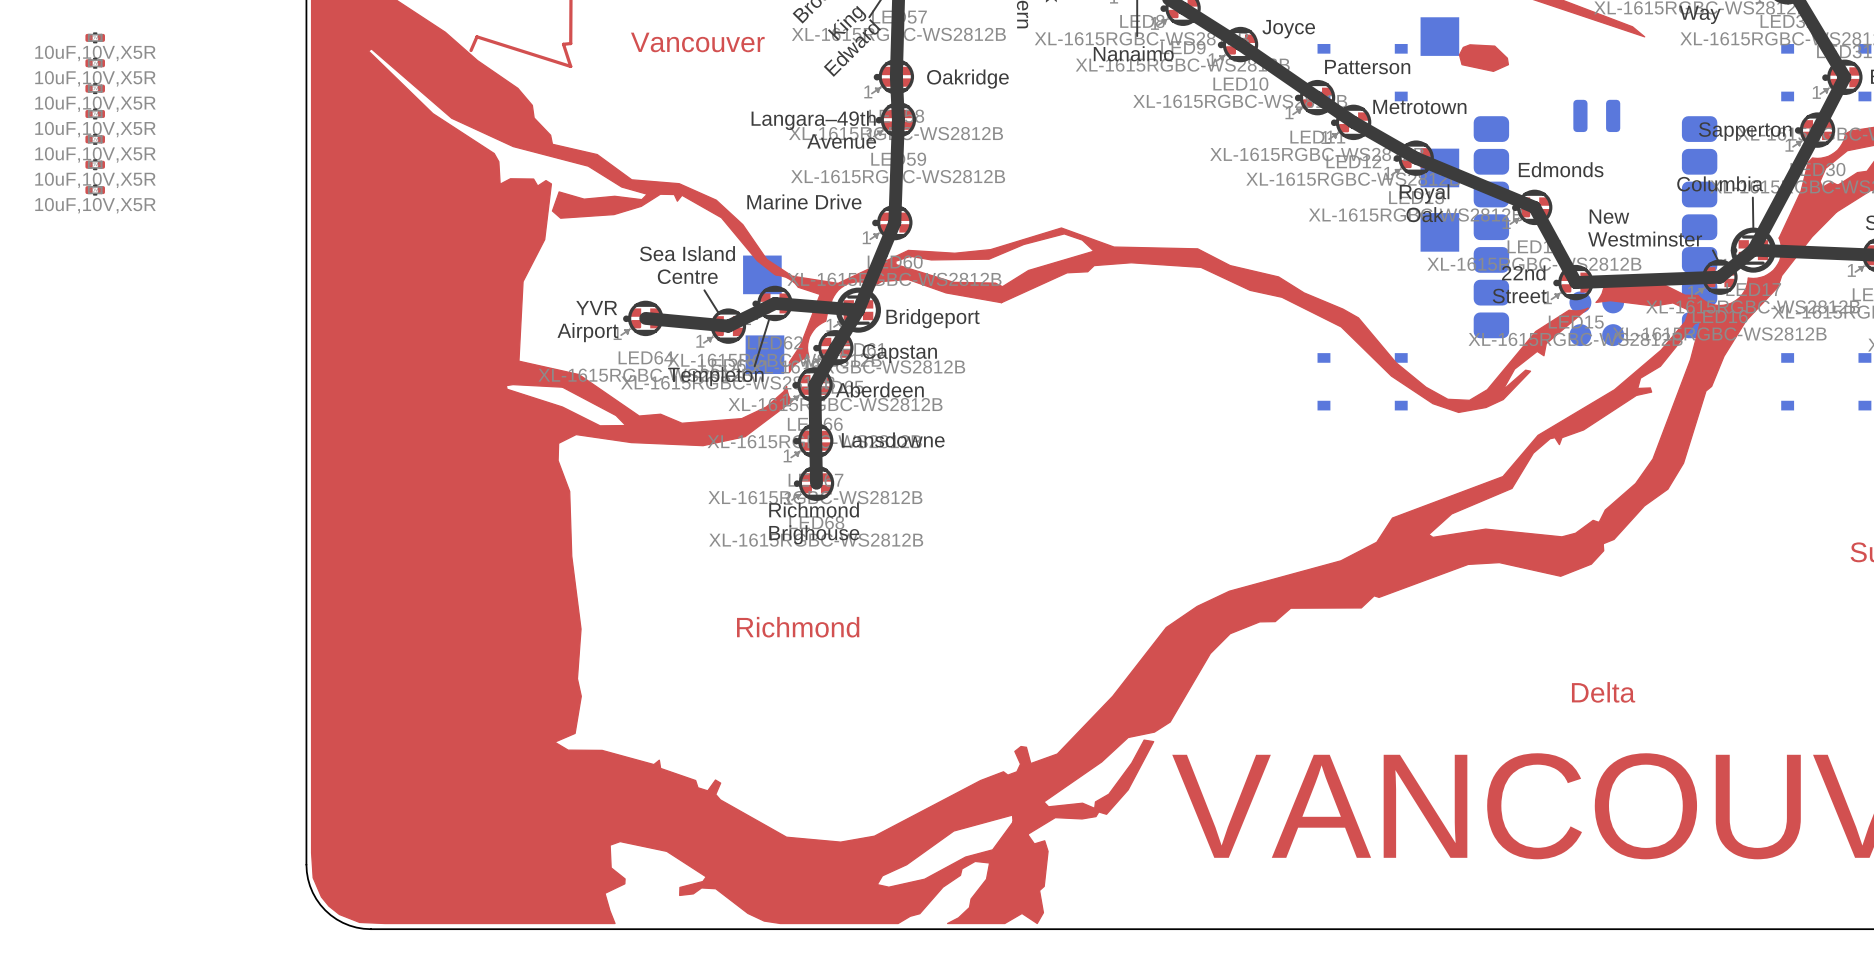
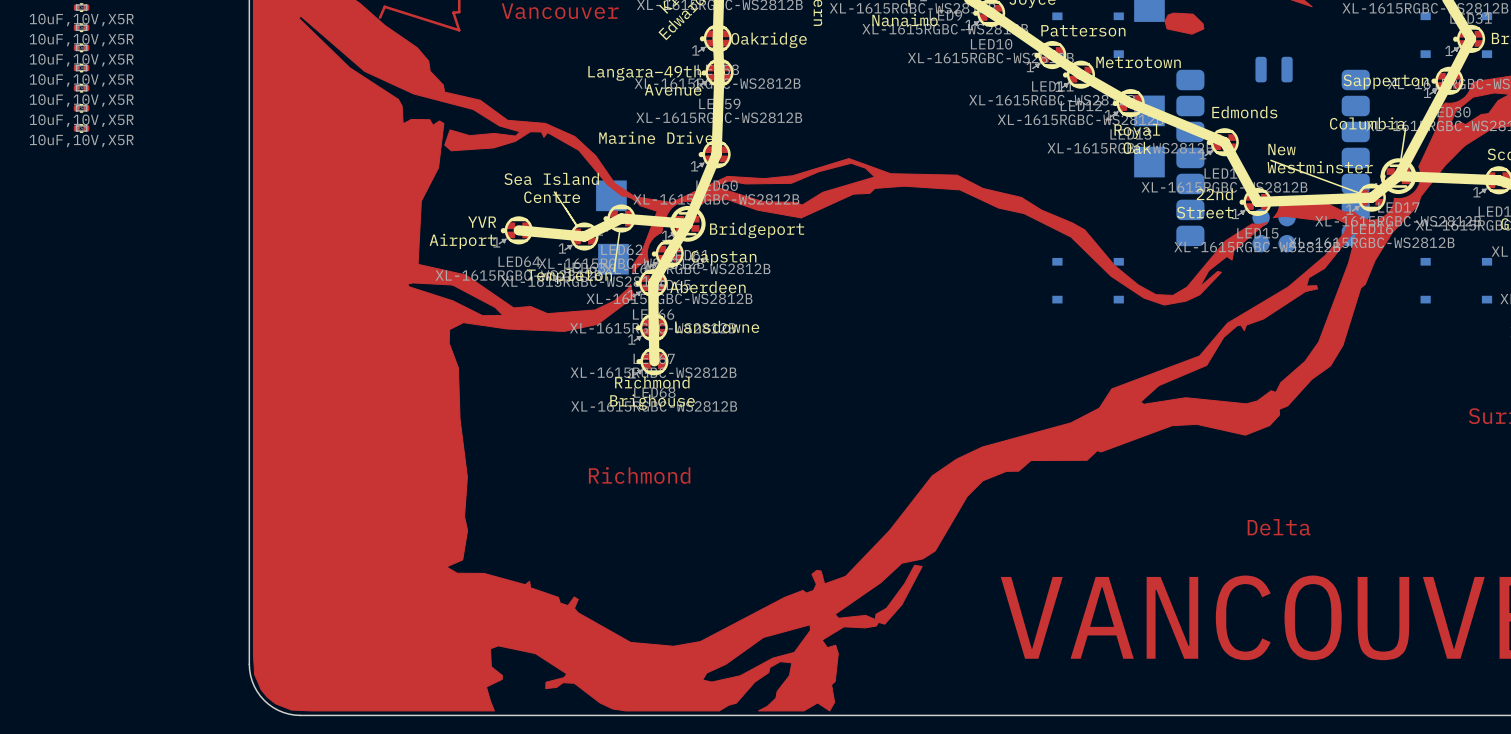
line: none -> (1405, 128) (1400, 161)
line: (1752, 197) (1753, 230) -> none
line: none -> (1270, 160) (1358, 192)
line: (1712, 250) (1719, 264) -> none
line: none -> (554, 192) (576, 224)
line: (768, 320) (754, 366) -> none
line: none -> (619, 232) (614, 271)

